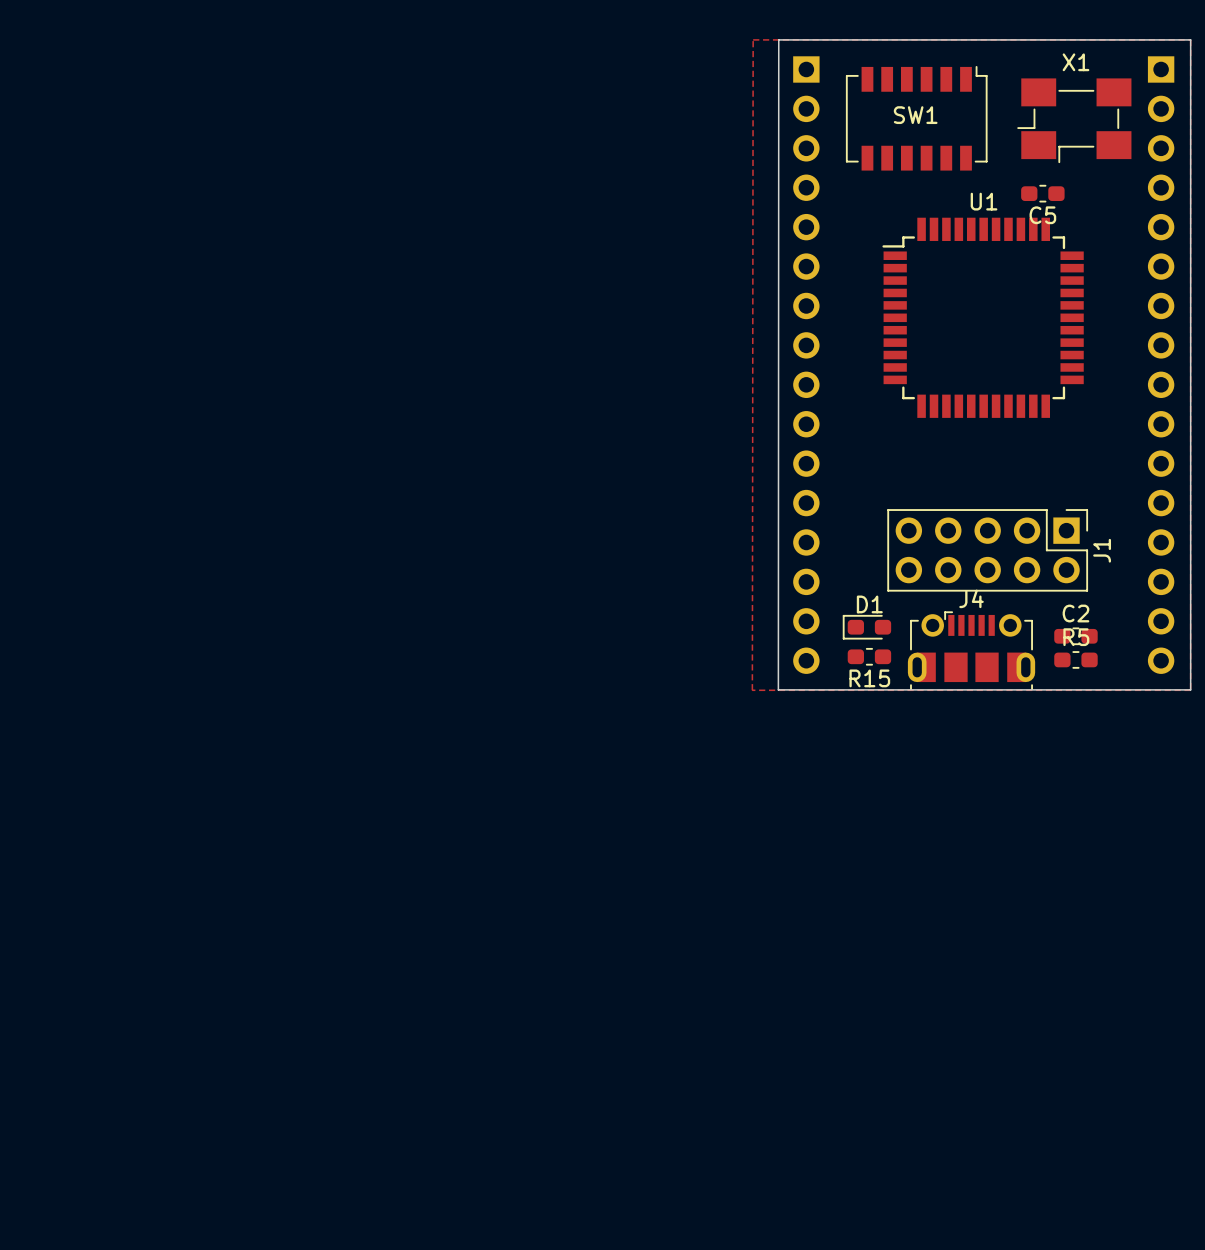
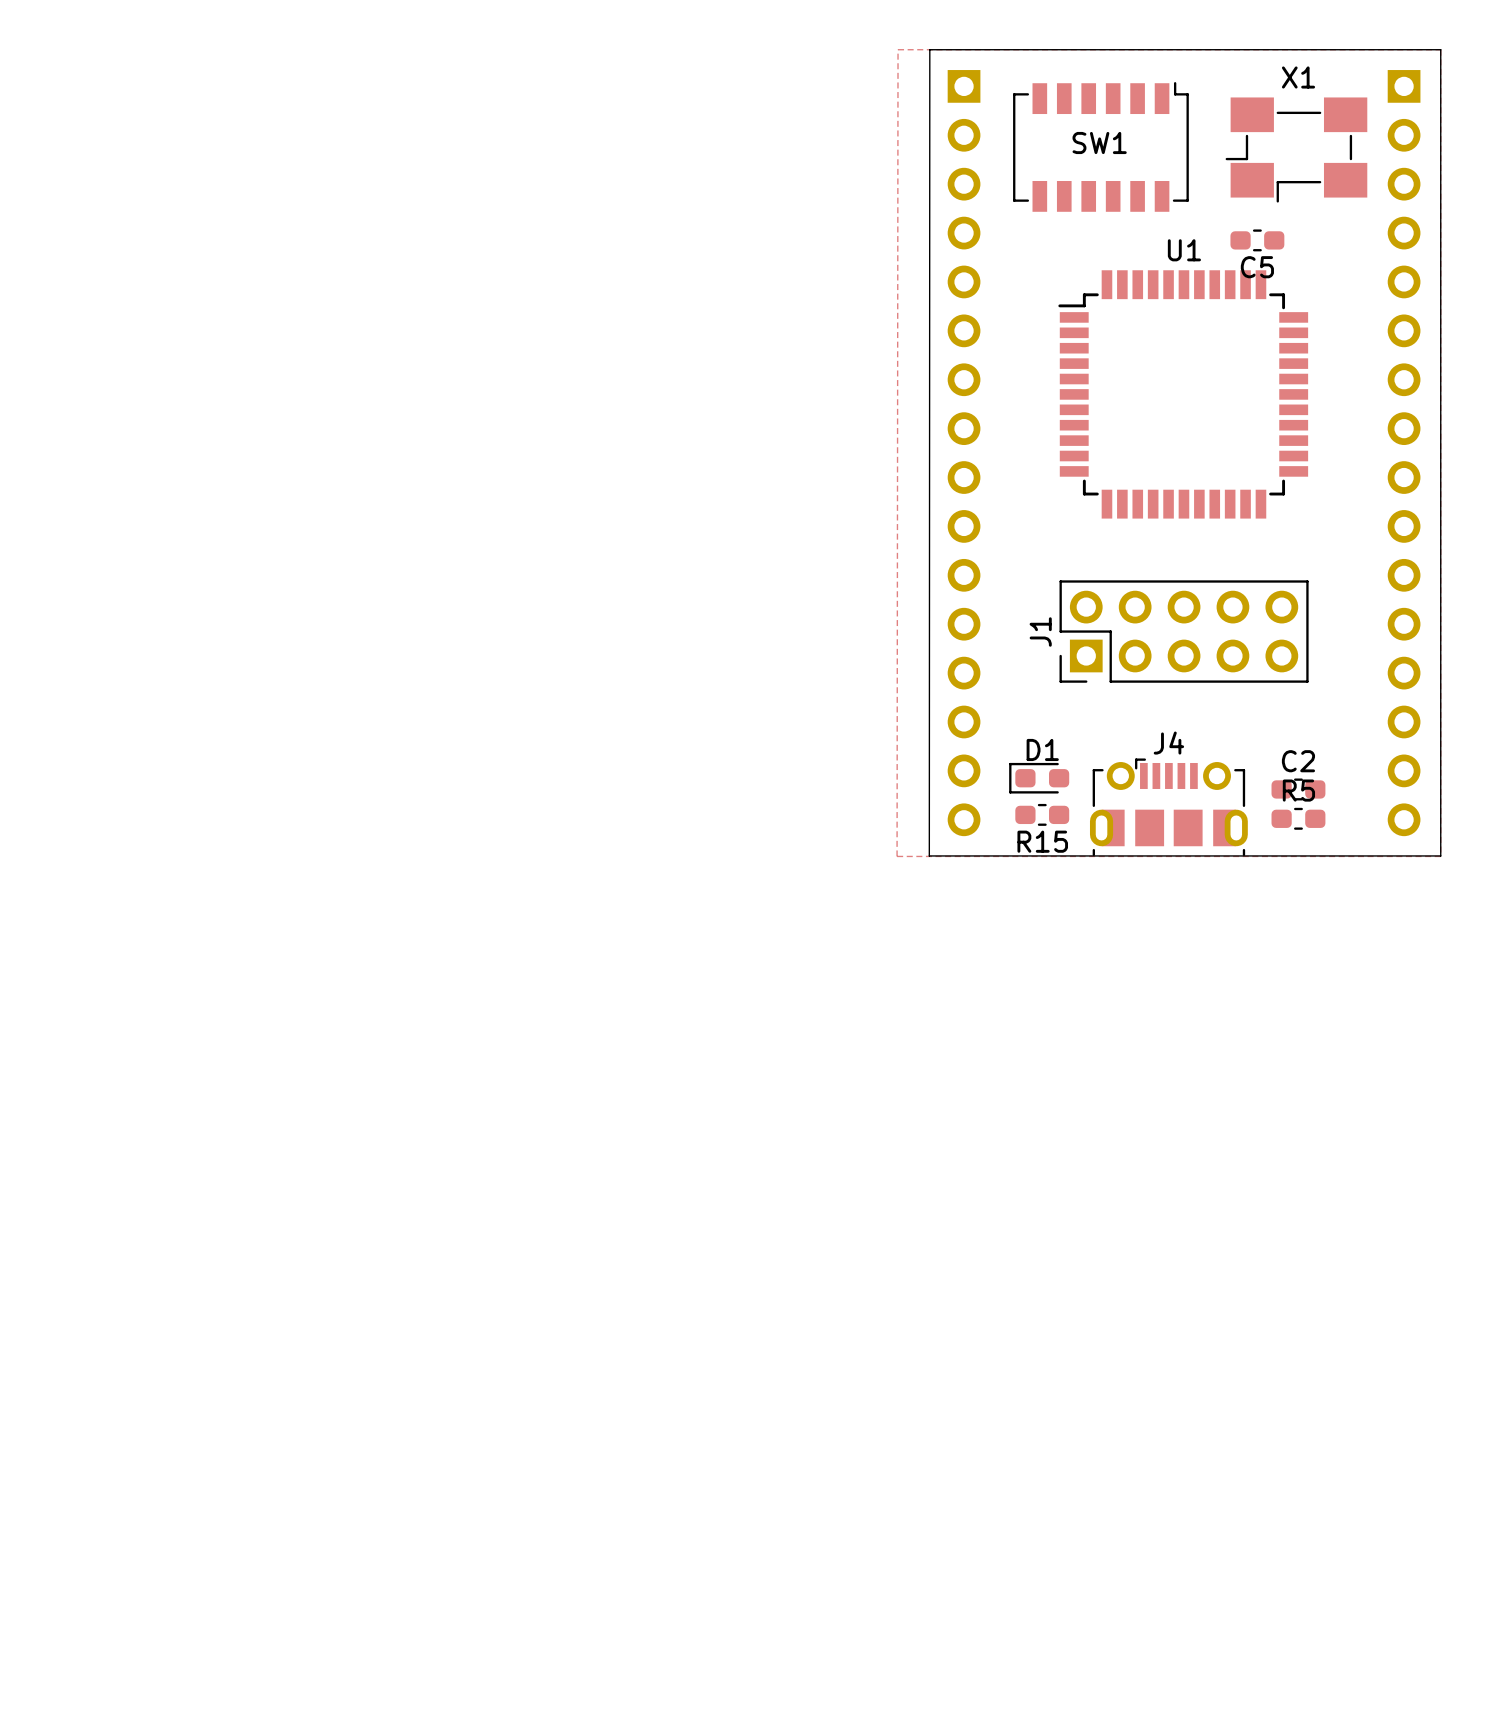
J1 rotation: 0° (987, 550) -> 180° (1184, 631)

